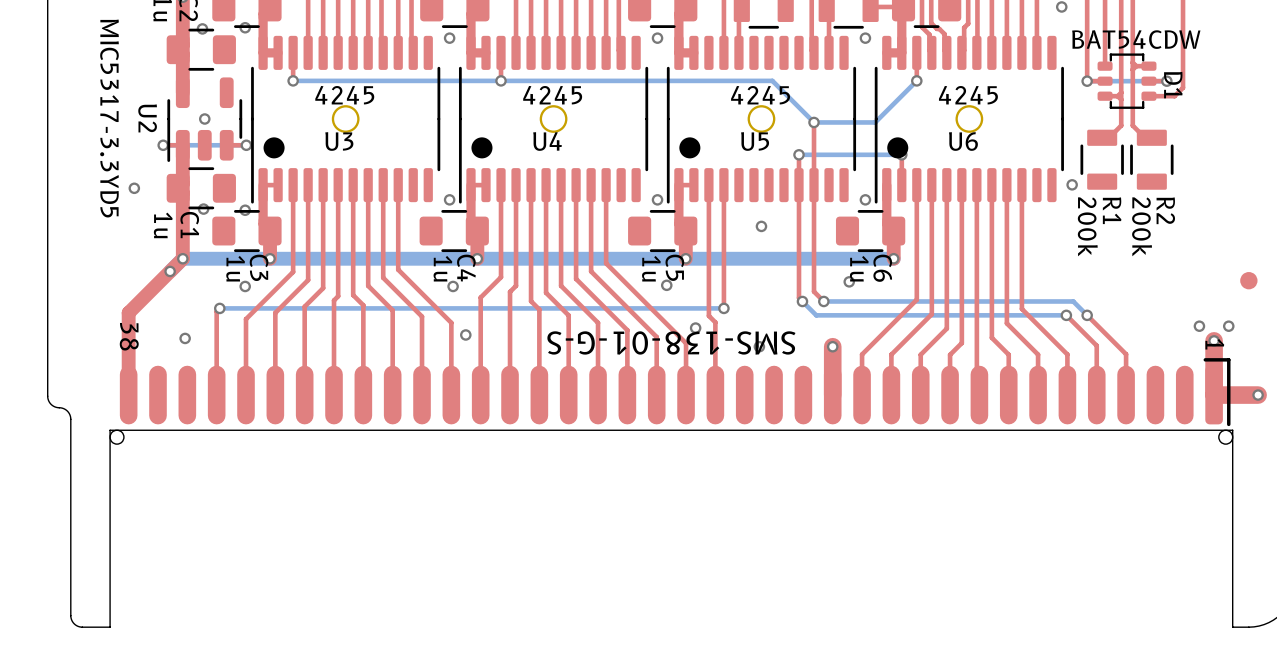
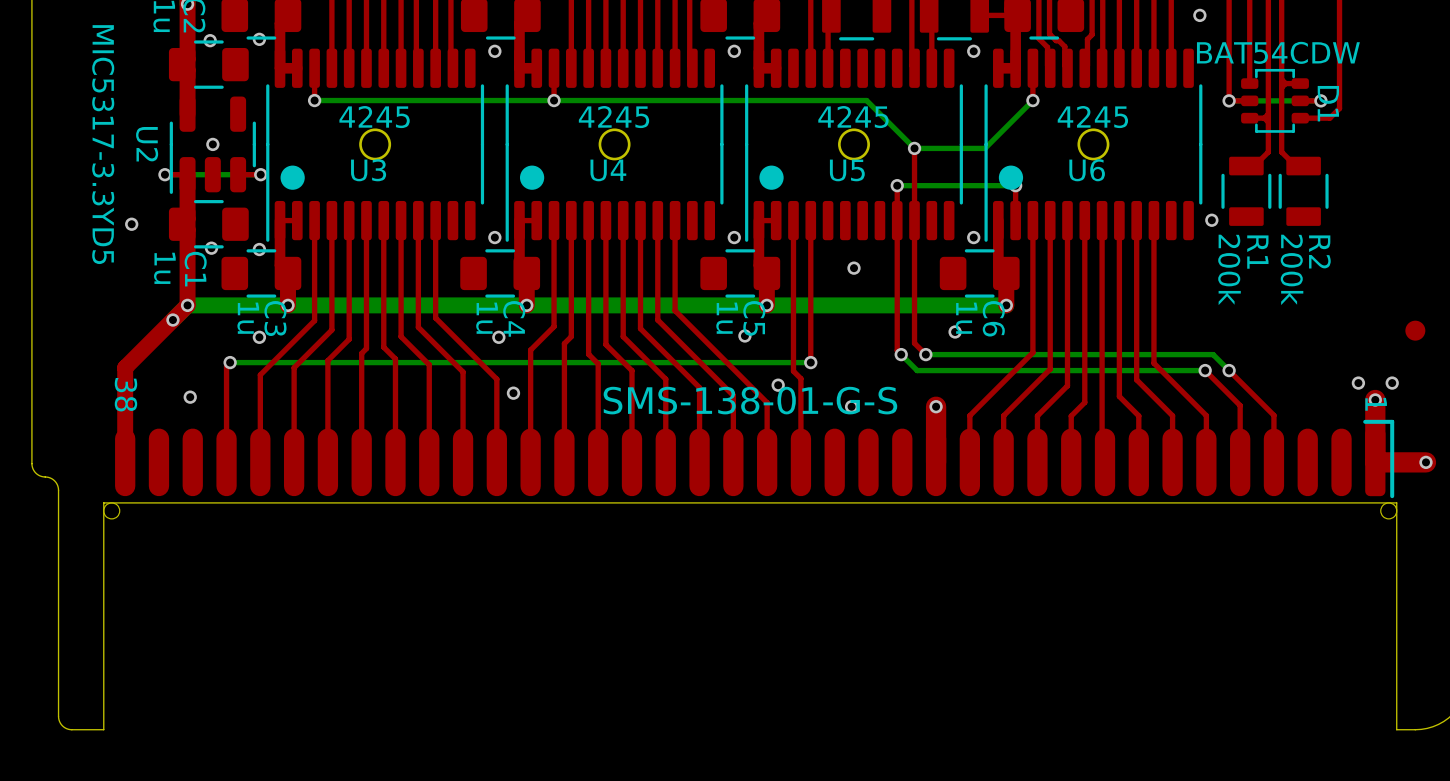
part value rotation: 0° (671, 342) -> 180° (750, 400)

